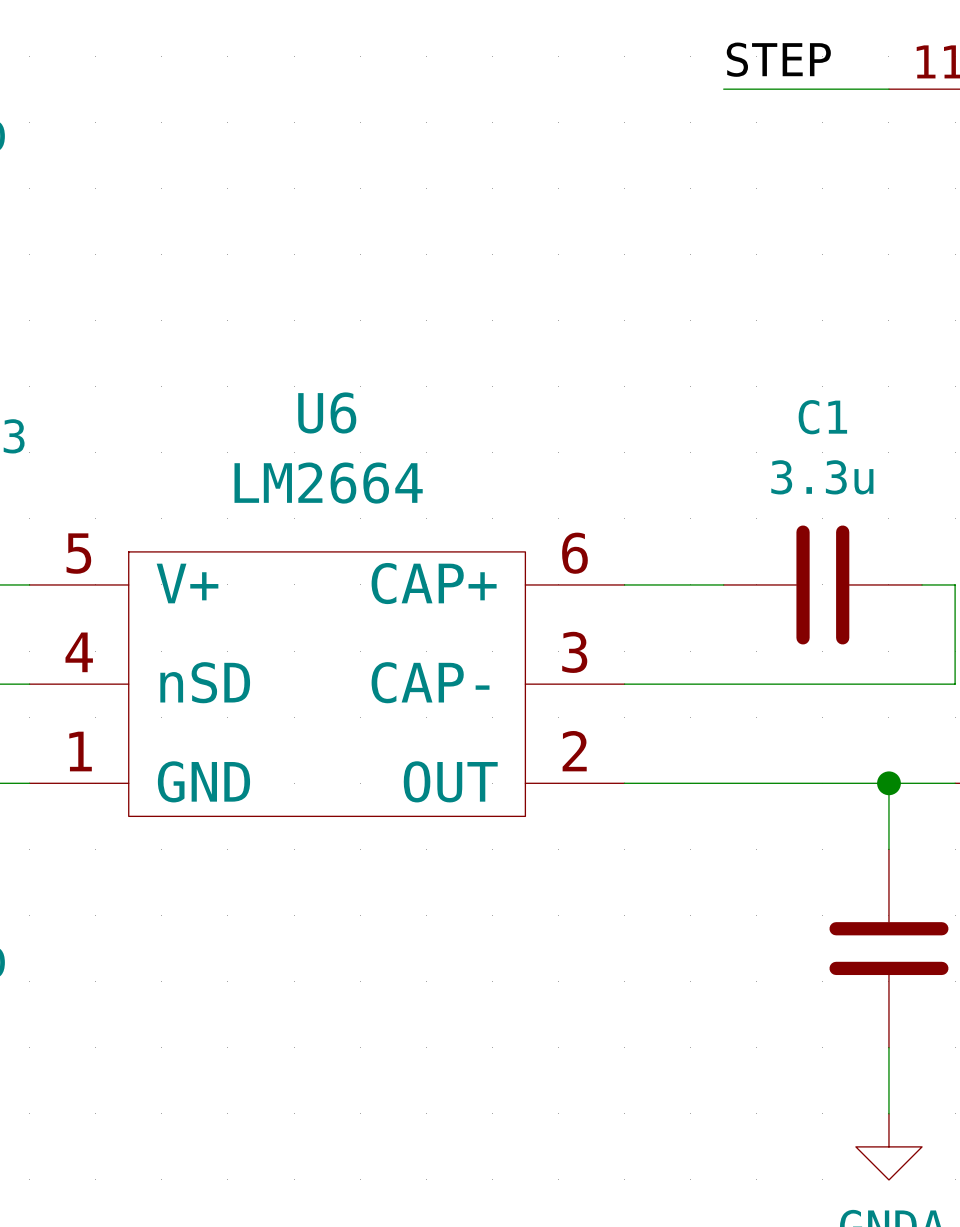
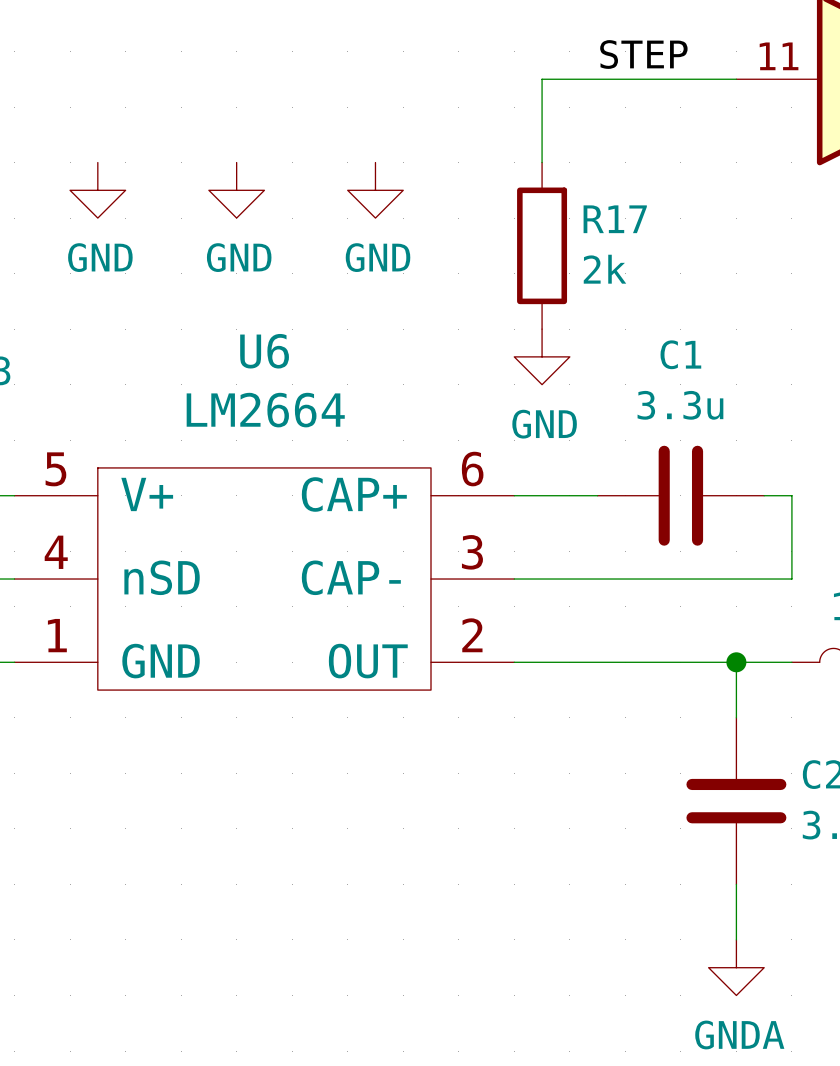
wire: none -> (597, 79) (542, 79) (542, 162)
power symbol: none -> GND (97, 190)
power symbol: none -> GND (236, 190)
power symbol: none -> GND (375, 190)
R17: none -> 2k (542, 245)
power symbol: none -> GND (542, 356)

